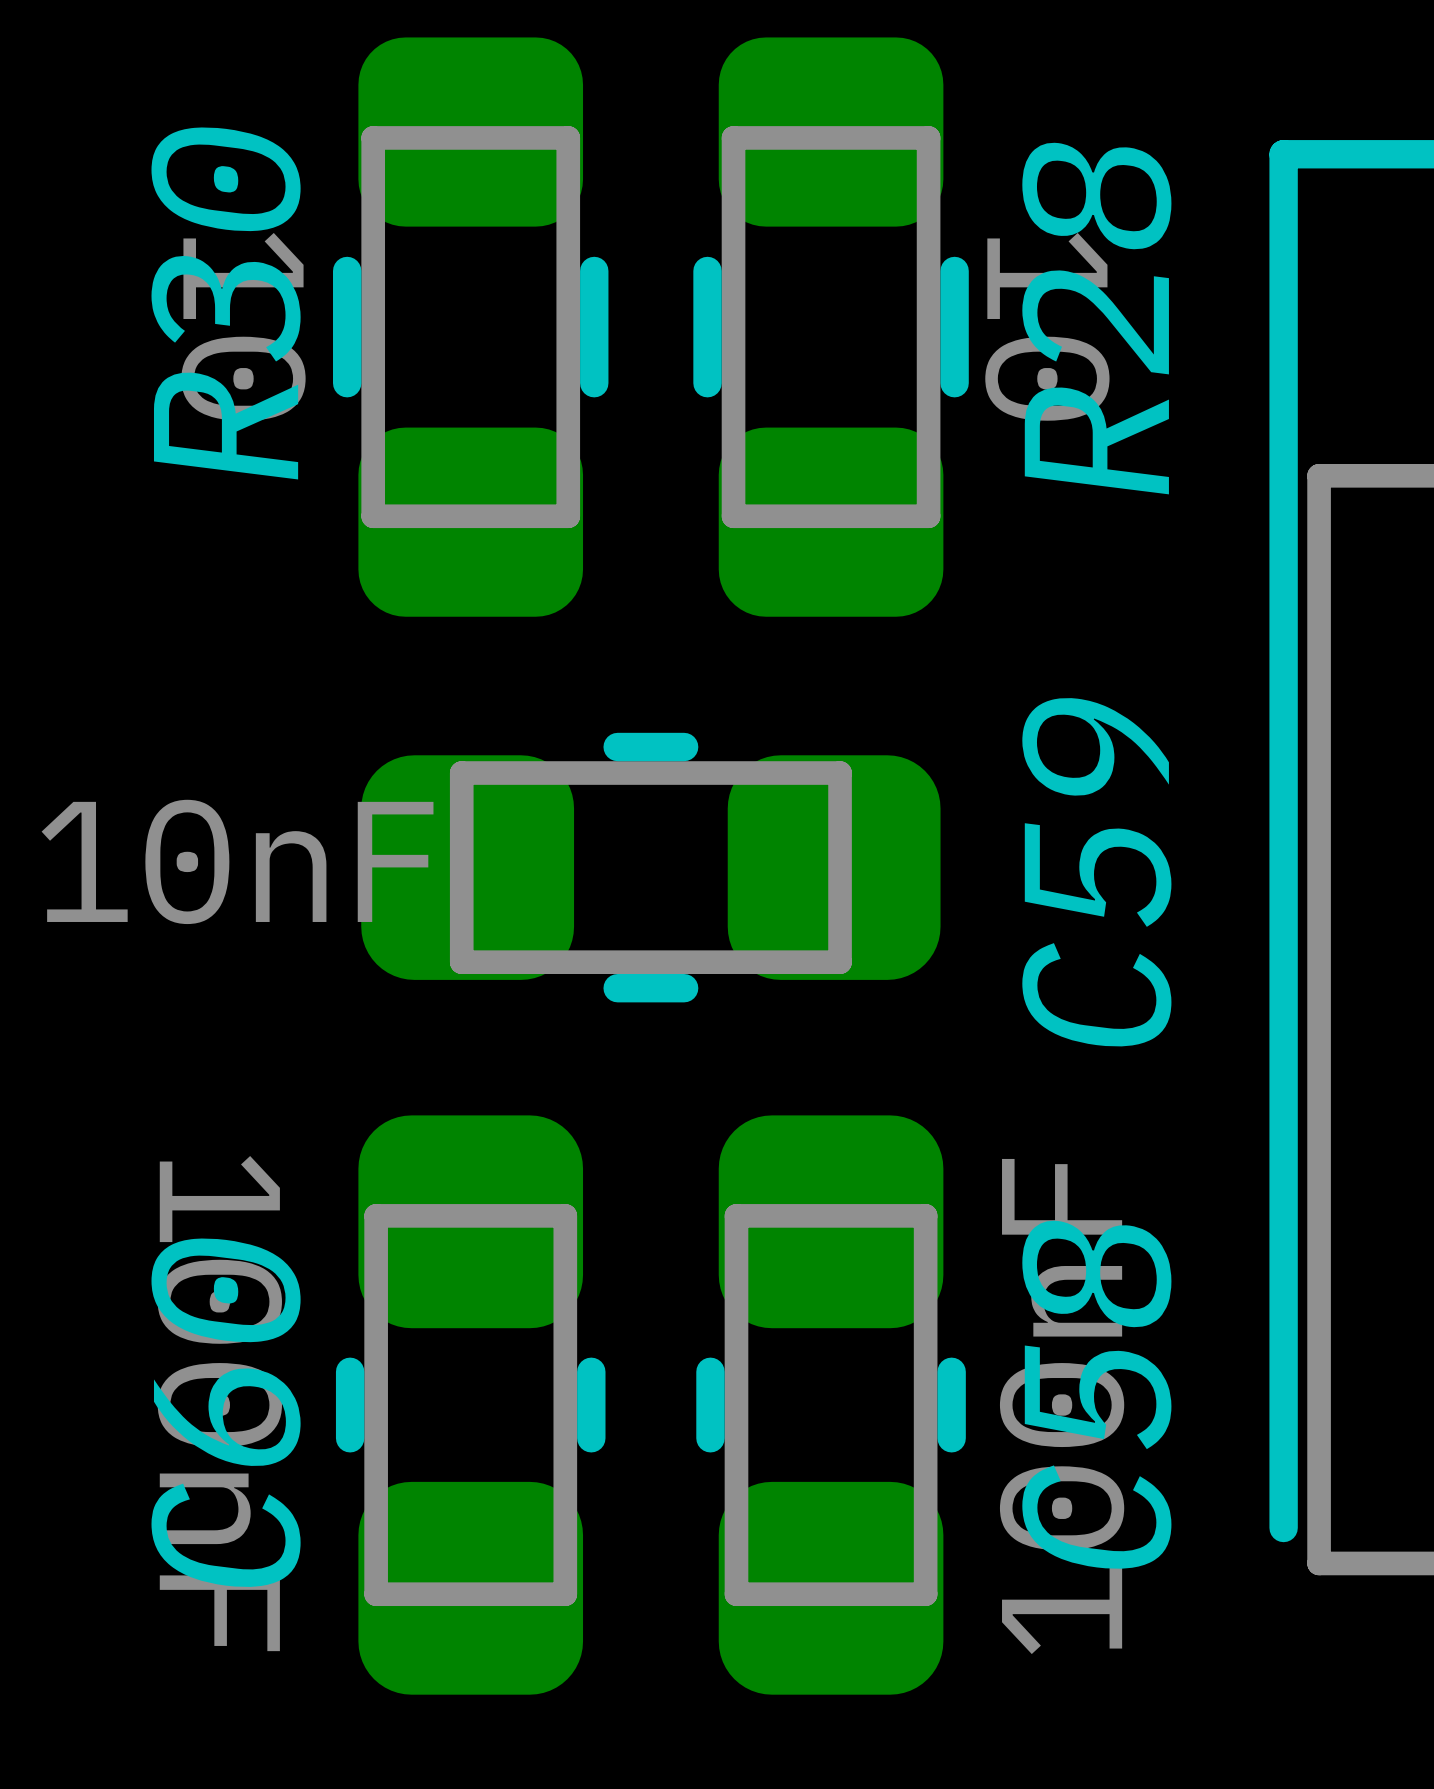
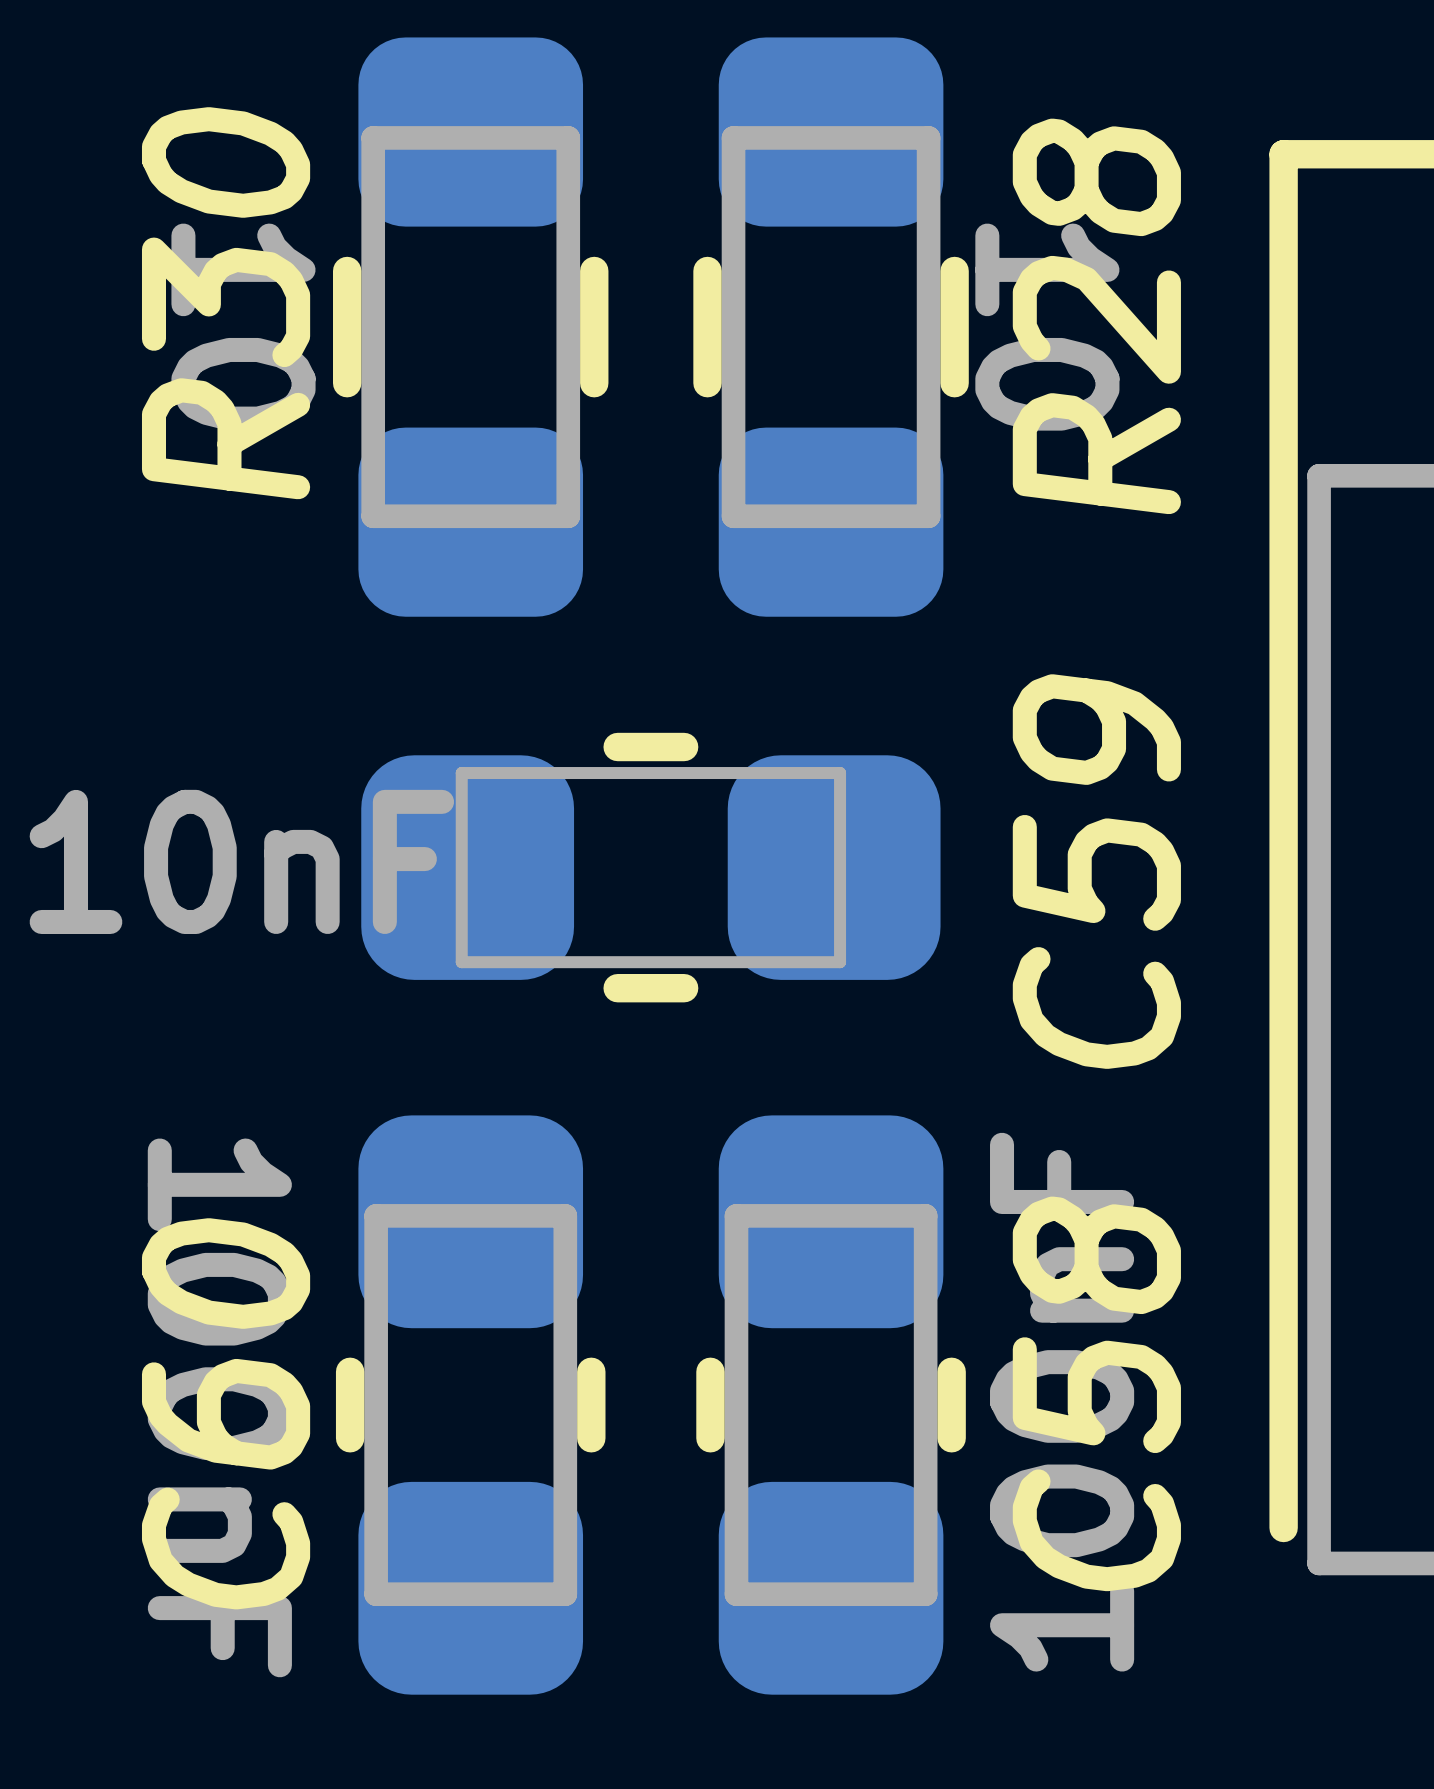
C59 footprint: [361, 732, 941, 1003] -> [361, 732, 941, 1003]

